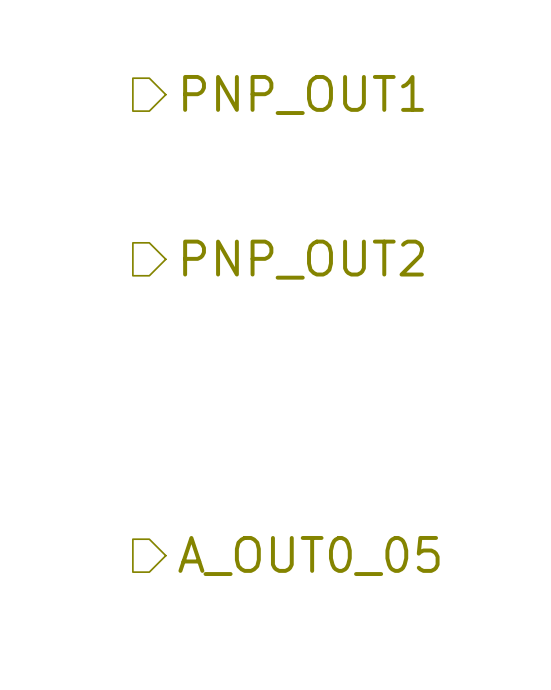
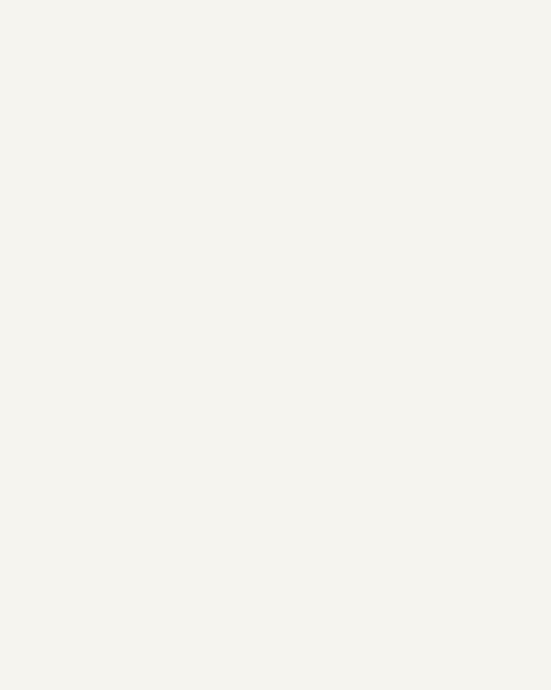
hierarchical label: PNP_OUT1 (303, 94) -> none
hierarchical label: PNP_OUT2 (303, 259) -> none
hierarchical label: A_OUT0_05 (309, 556) -> none

